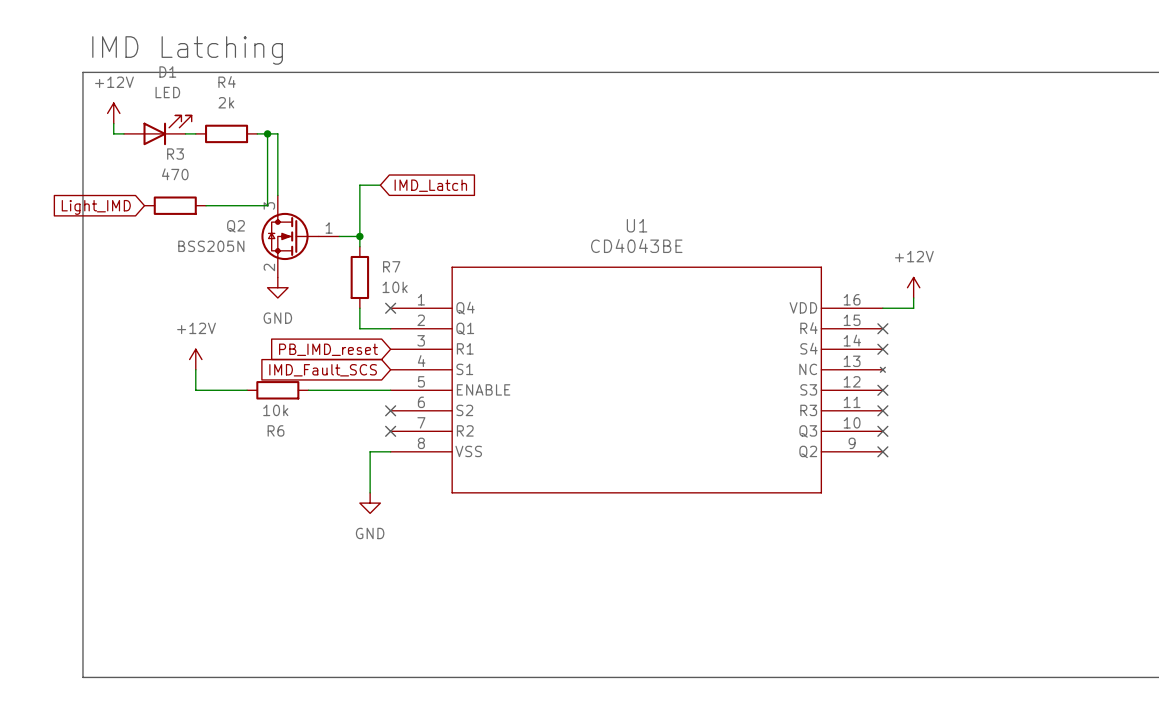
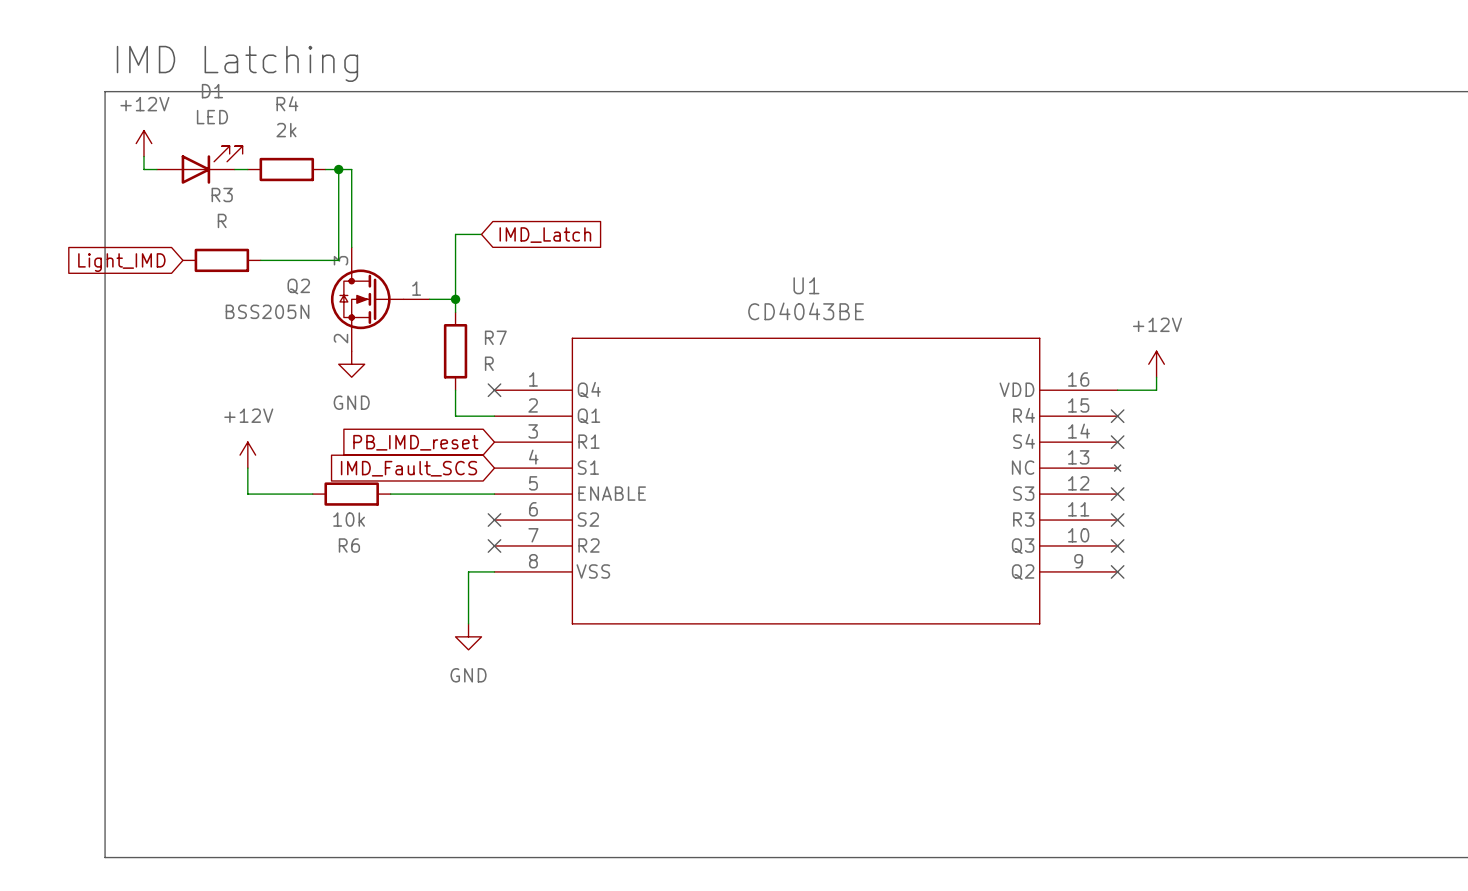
R3 value: 470 (175, 174) -> R (222, 220)
R7 value: 10k (395, 287) -> R (489, 363)

